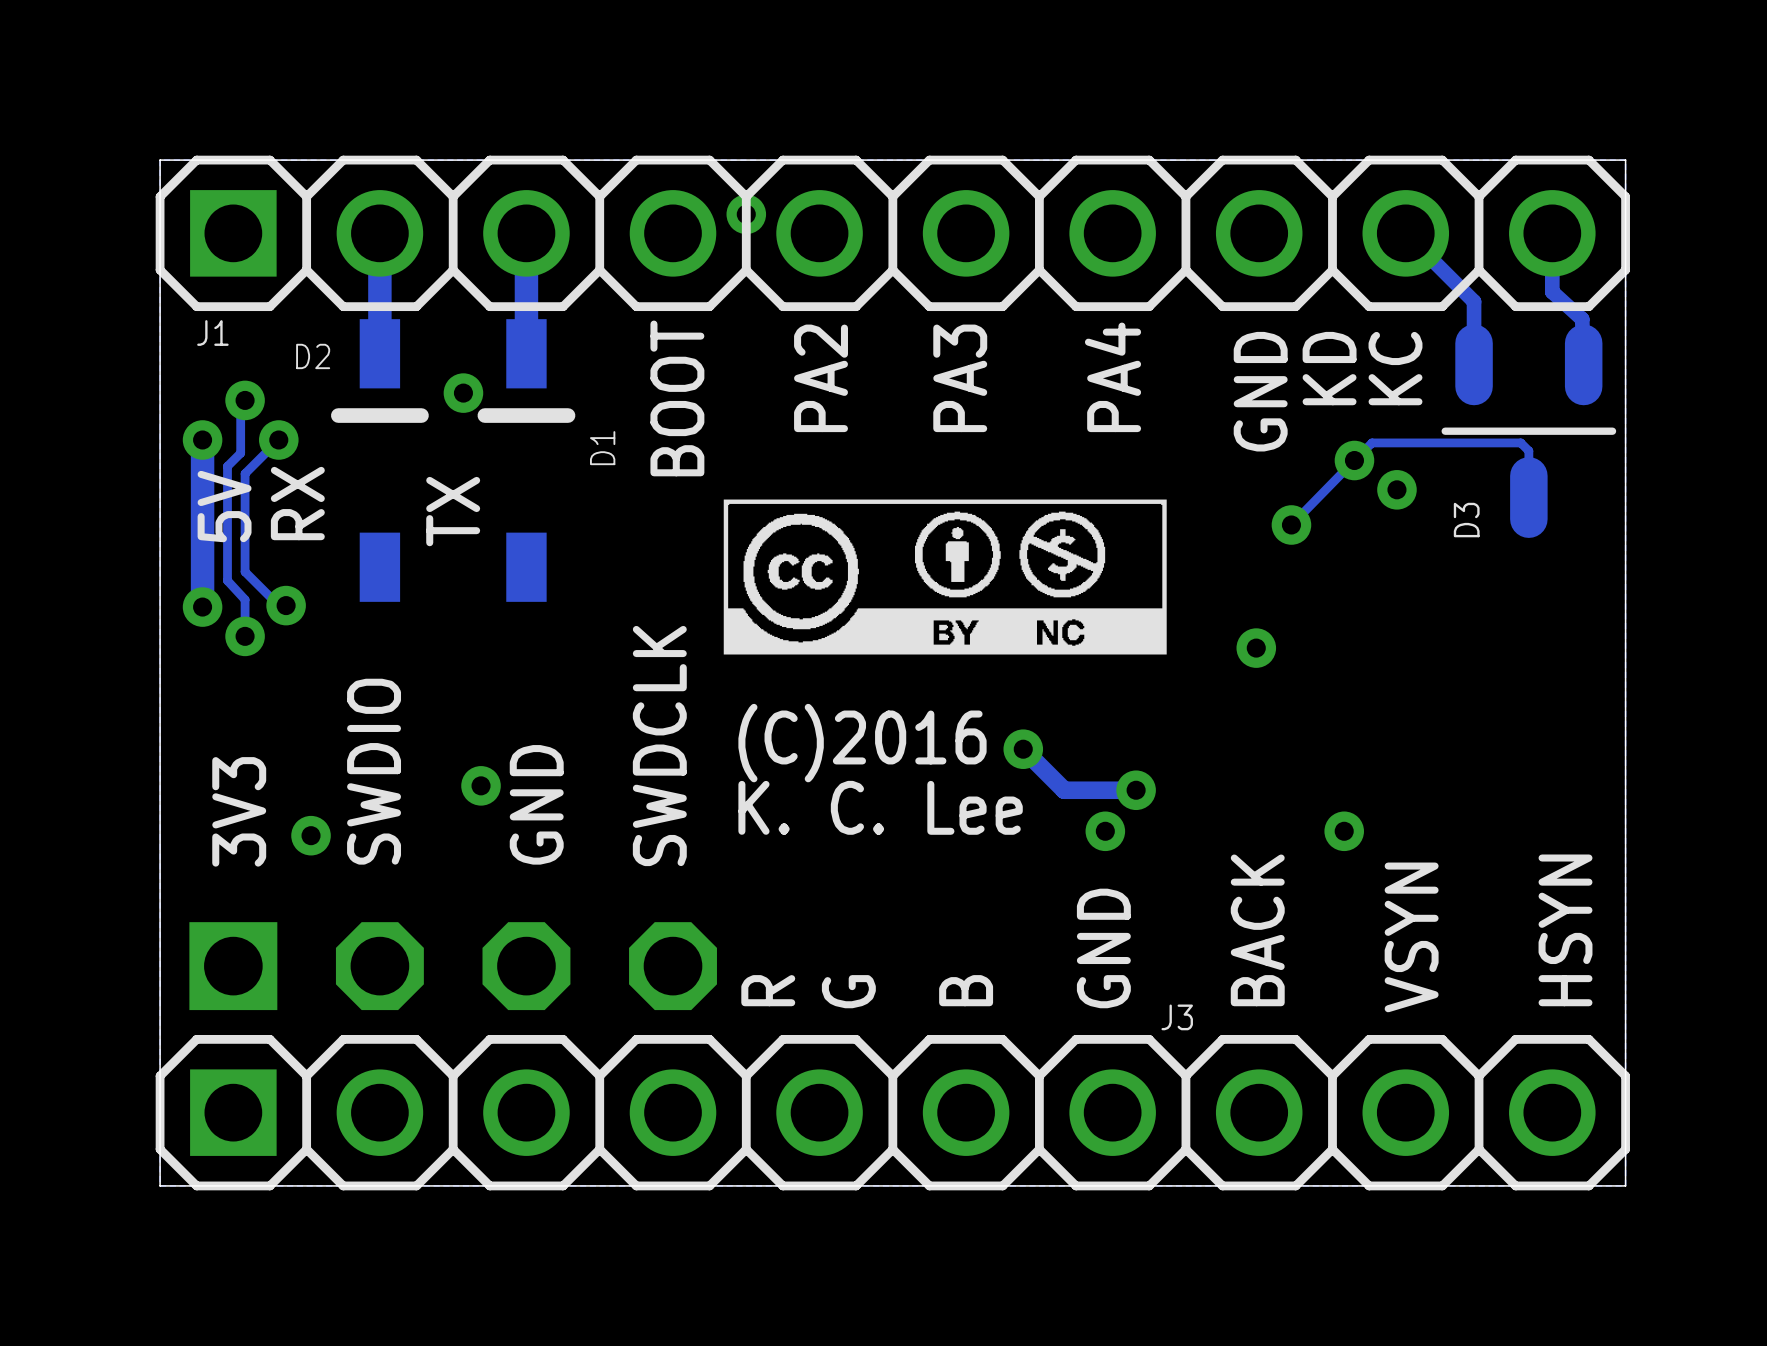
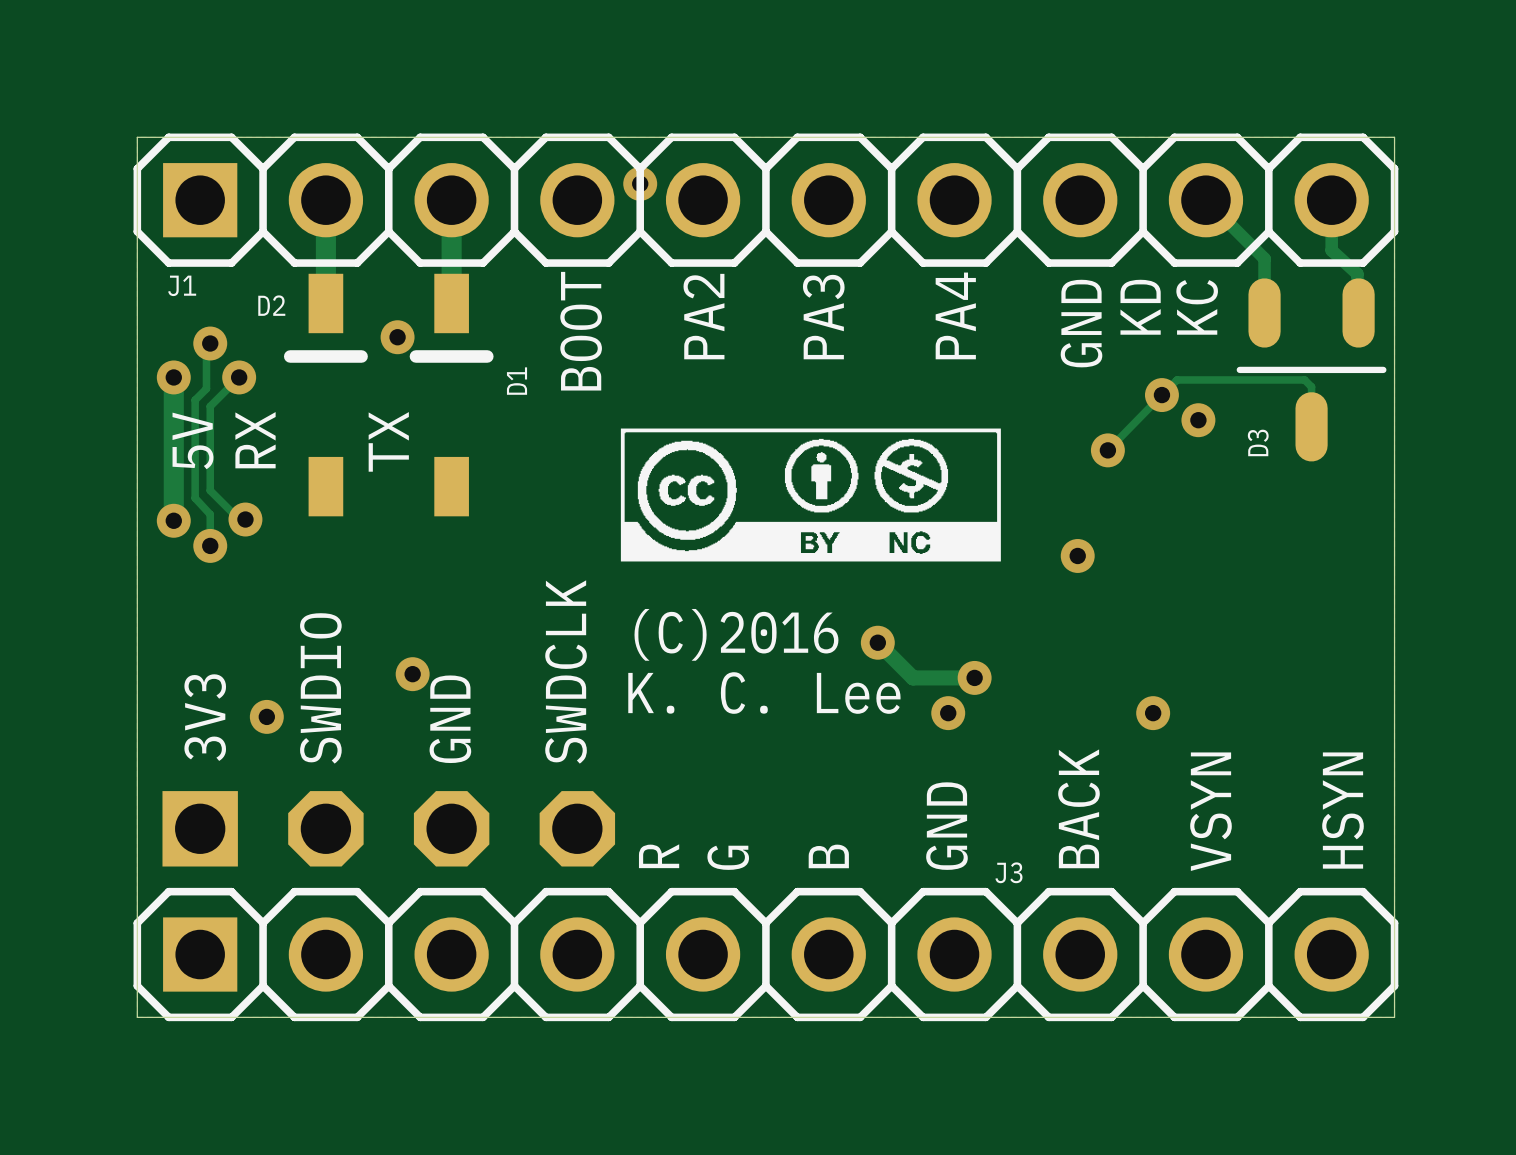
text position: SWDCLK (659, 746) -> SWDCLK (566, 671)
text position: SWDIO (374, 771) -> SWDIO (320, 688)
text position: GND (536, 804) -> GND (450, 719)
text position: 3V3 (239, 811) -> 3V3 (205, 717)

